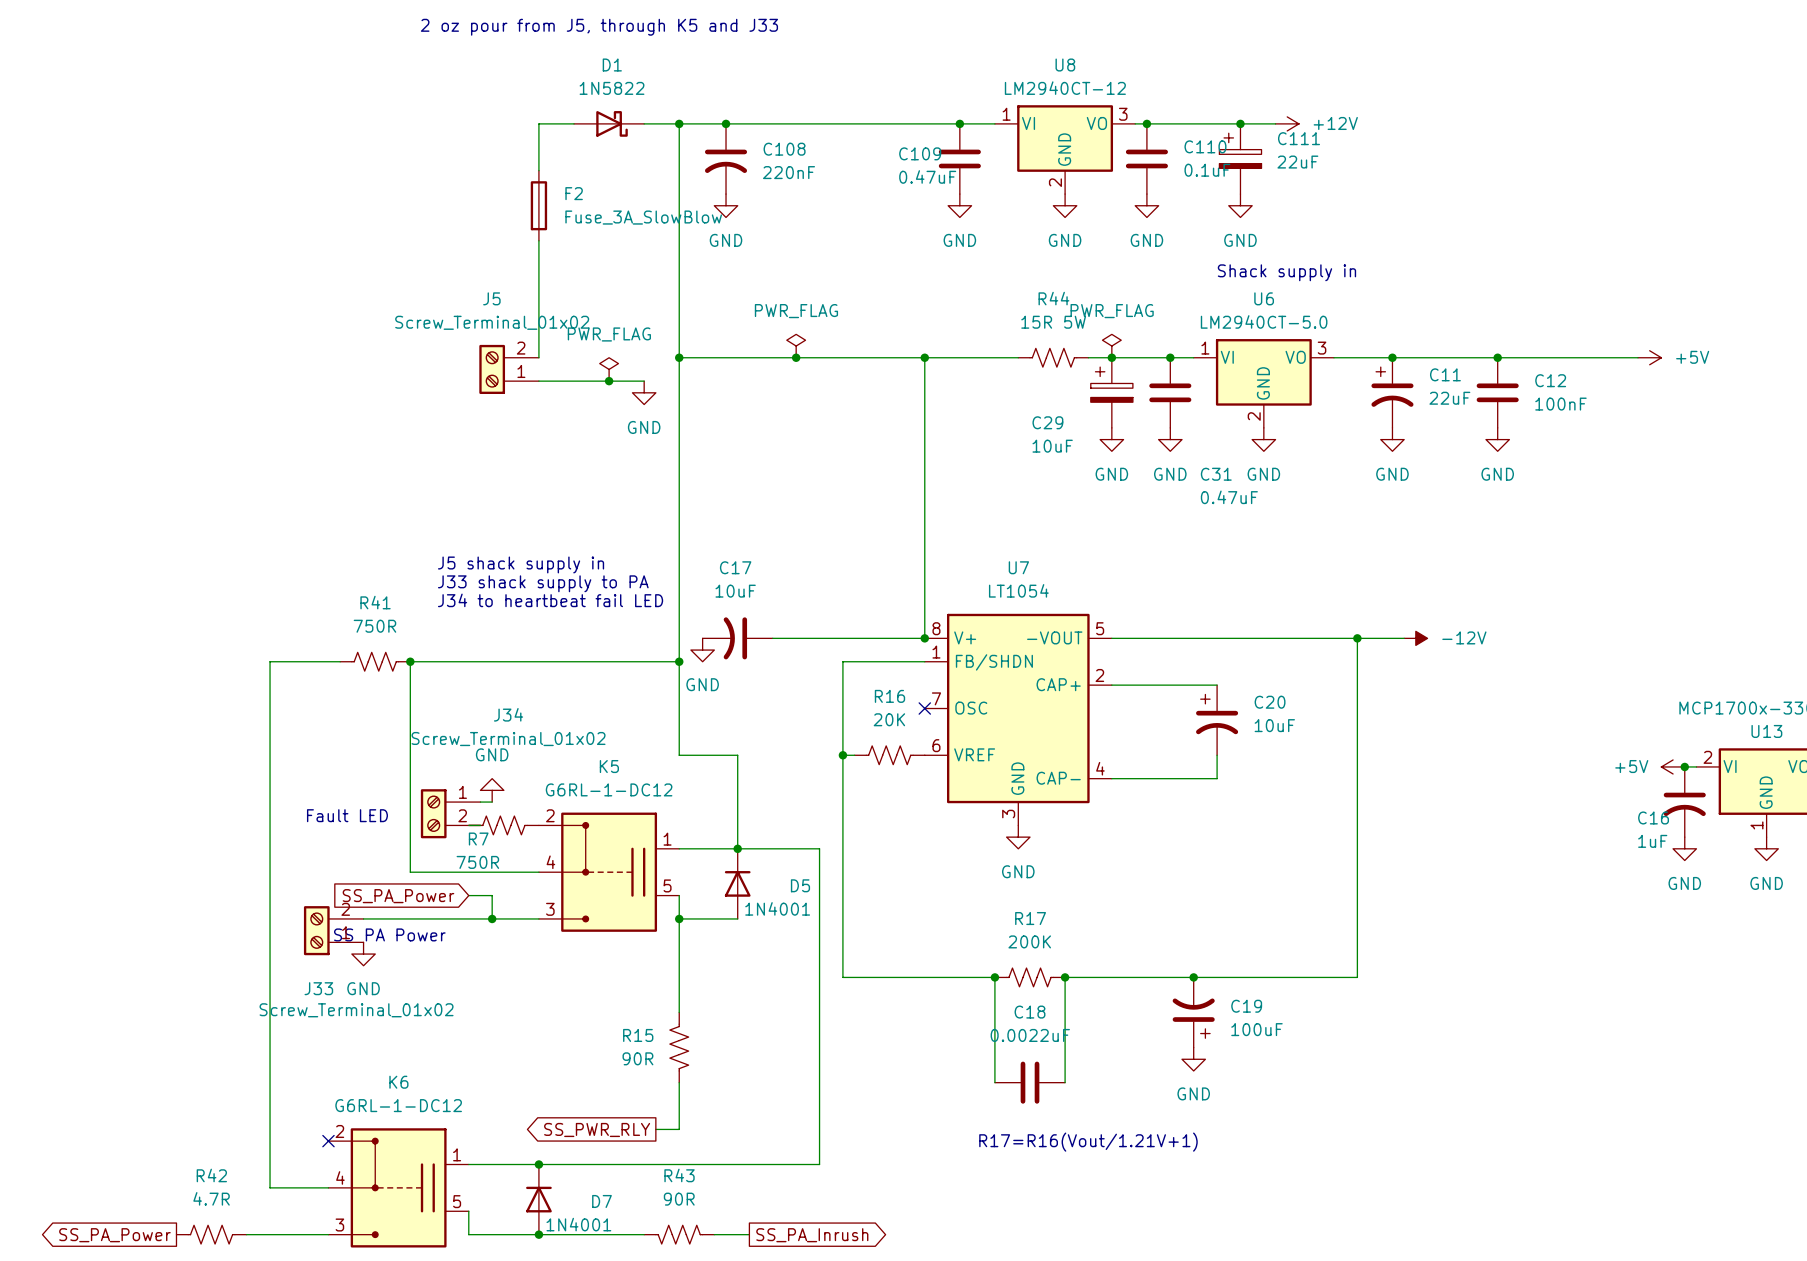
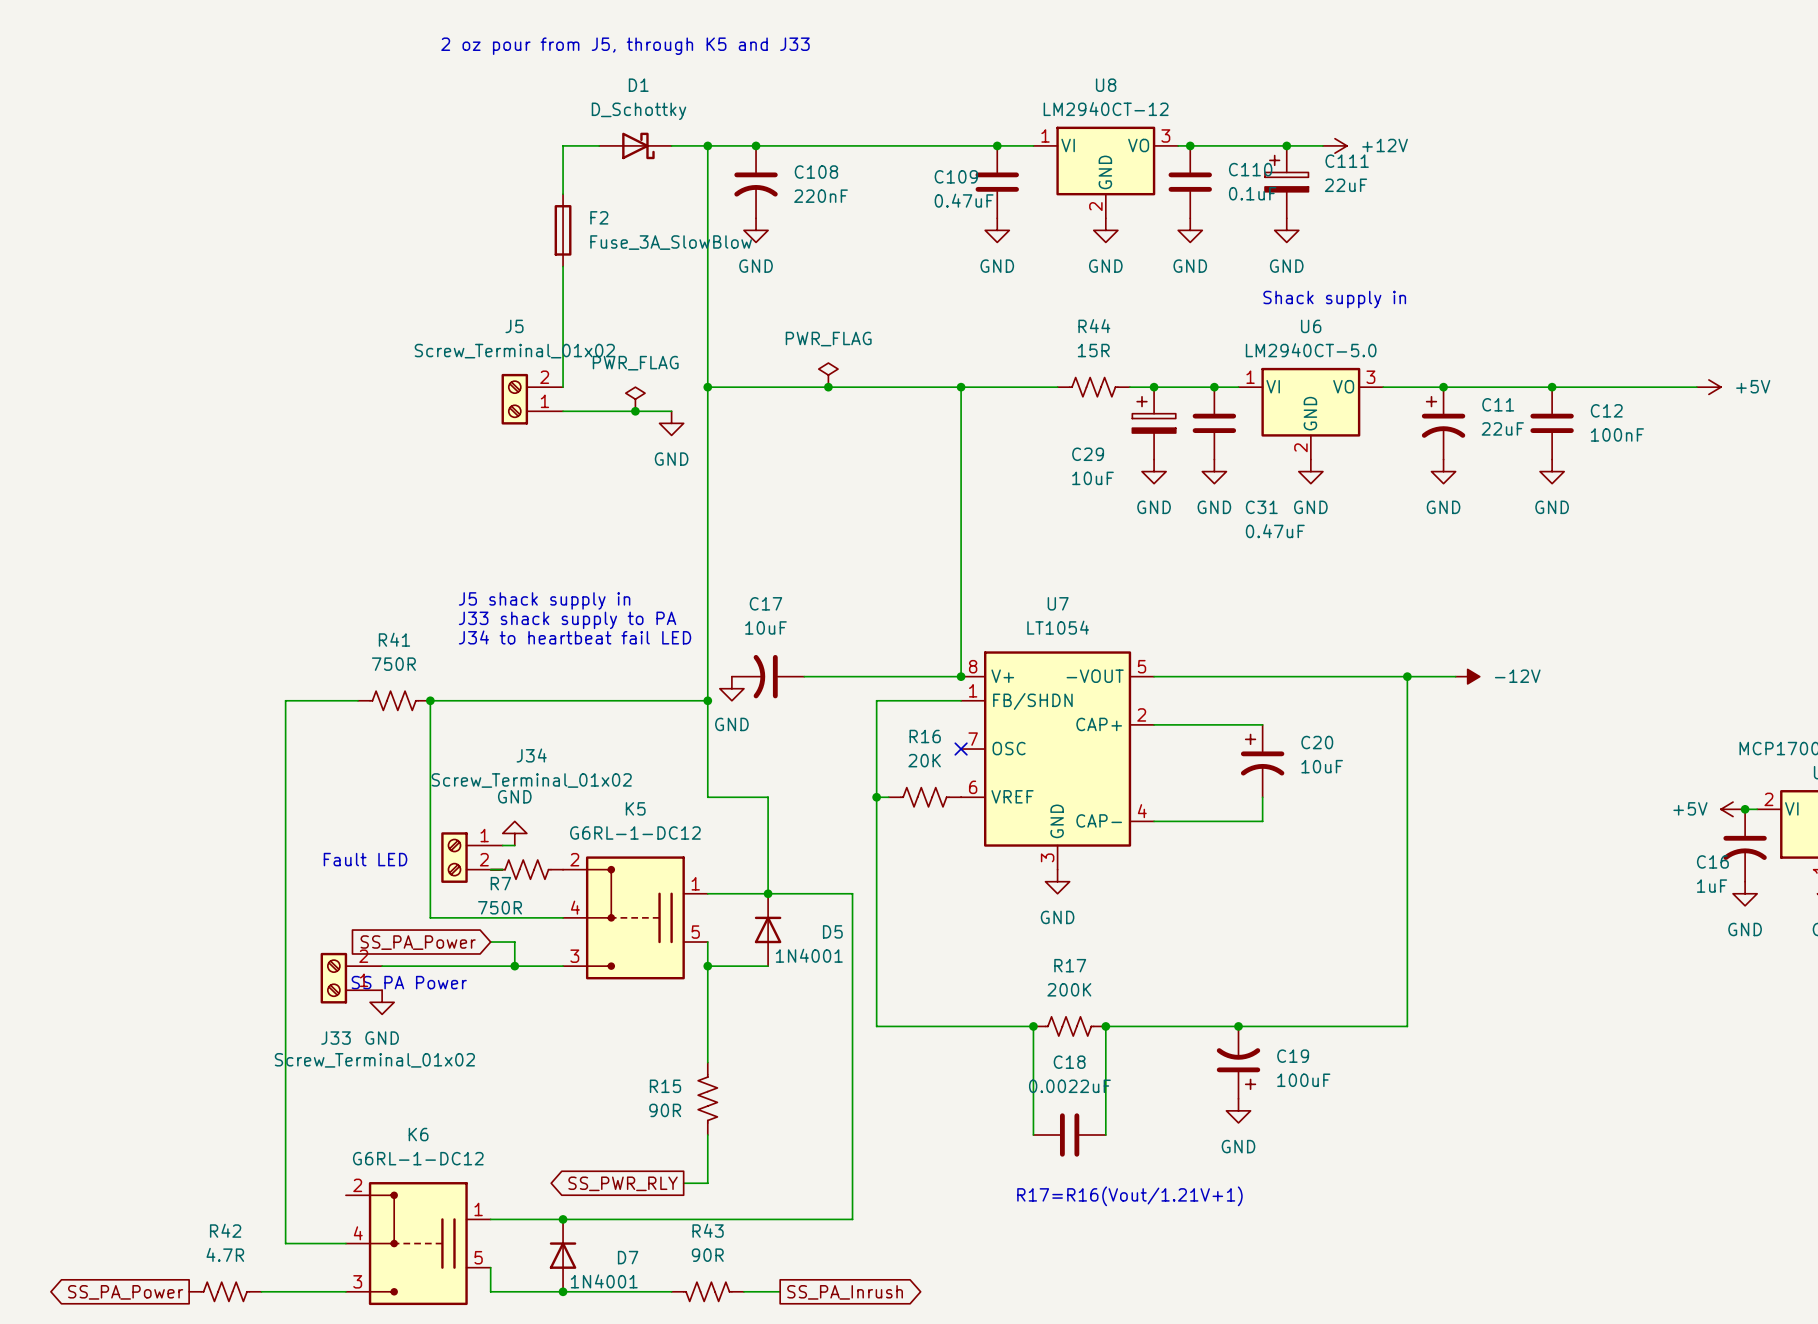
D1 value: 1N5822 (612, 88) -> D_Schottky (639, 111)
R44 value: 15R 5W (1053, 322) -> 15R (1093, 350)
power symbol: PWR_FLAG (1111, 346) -> none
no-connect mark: (328, 1141) -> none

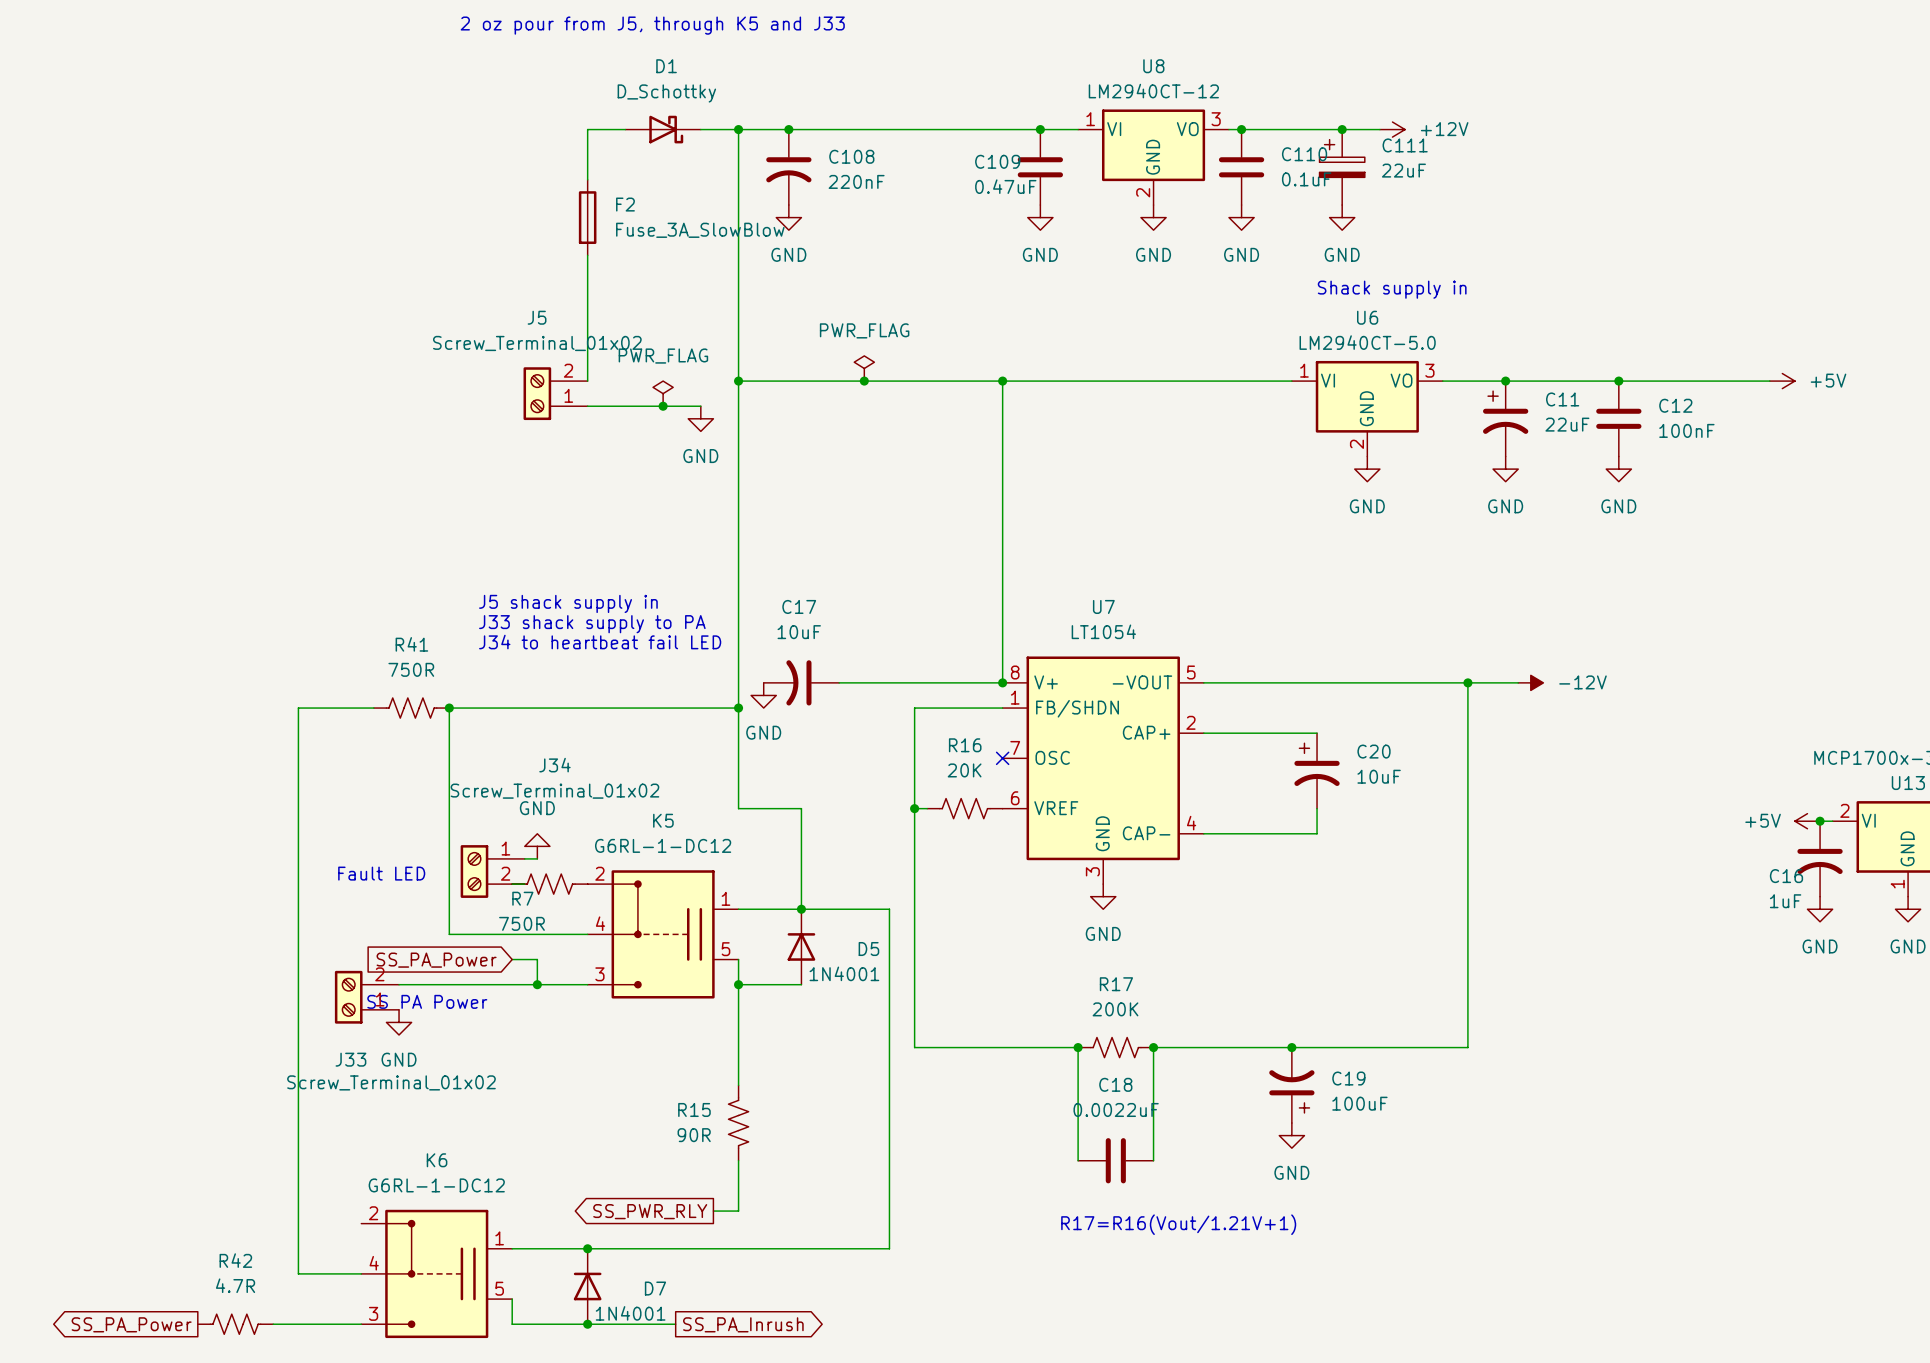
R44: 15R (1093, 387) -> none
junction: (1154, 387) -> none
junction: (1214, 387) -> none
C29: 10uF (1154, 423) -> none
C31: 0.47uF (1214, 423) -> none
power symbol: GND (1154, 471) -> none
power symbol: GND (1214, 471) -> none
wire: (647, 1291) (671, 1291) -> none
R43: 90R (707, 1291) -> none
wire: (743, 1291) (780, 1291) -> none
global label position: SS_PA_Inrush (845, 1292) -> SS_PA_Inrush (743, 1324)

